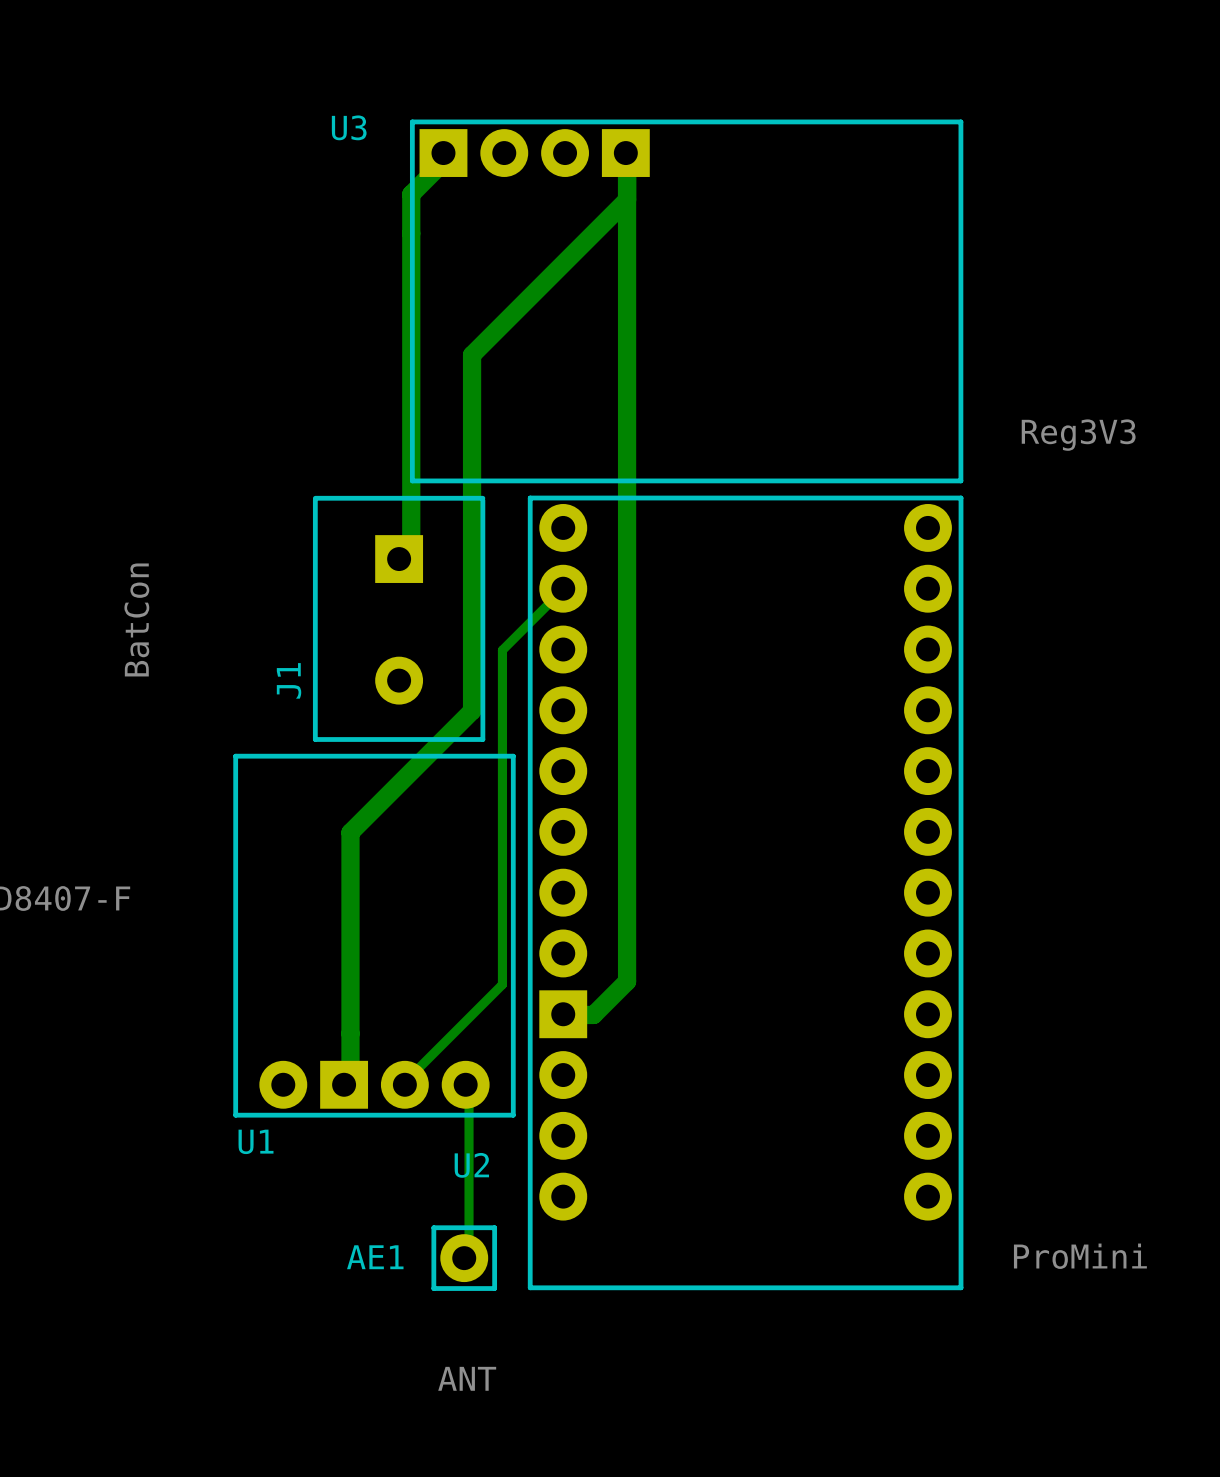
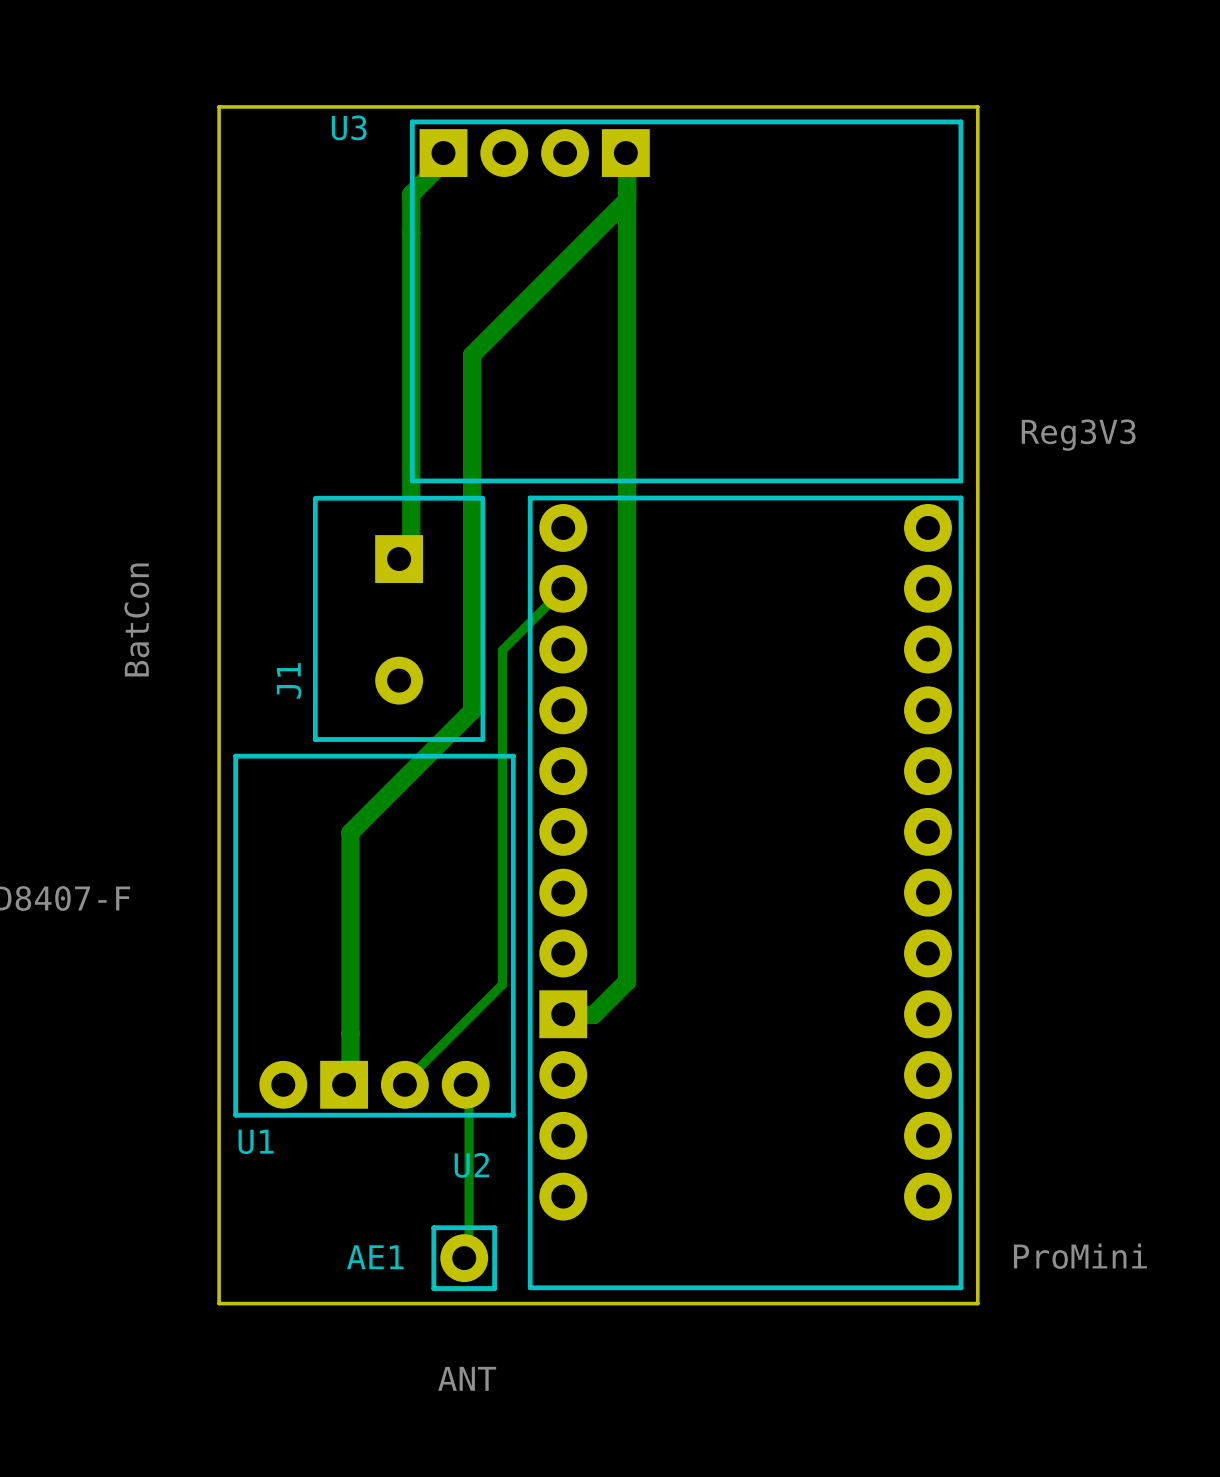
board edge: none -> (219, 106) (219, 1303) (977, 1303) (977, 106) (219, 106)

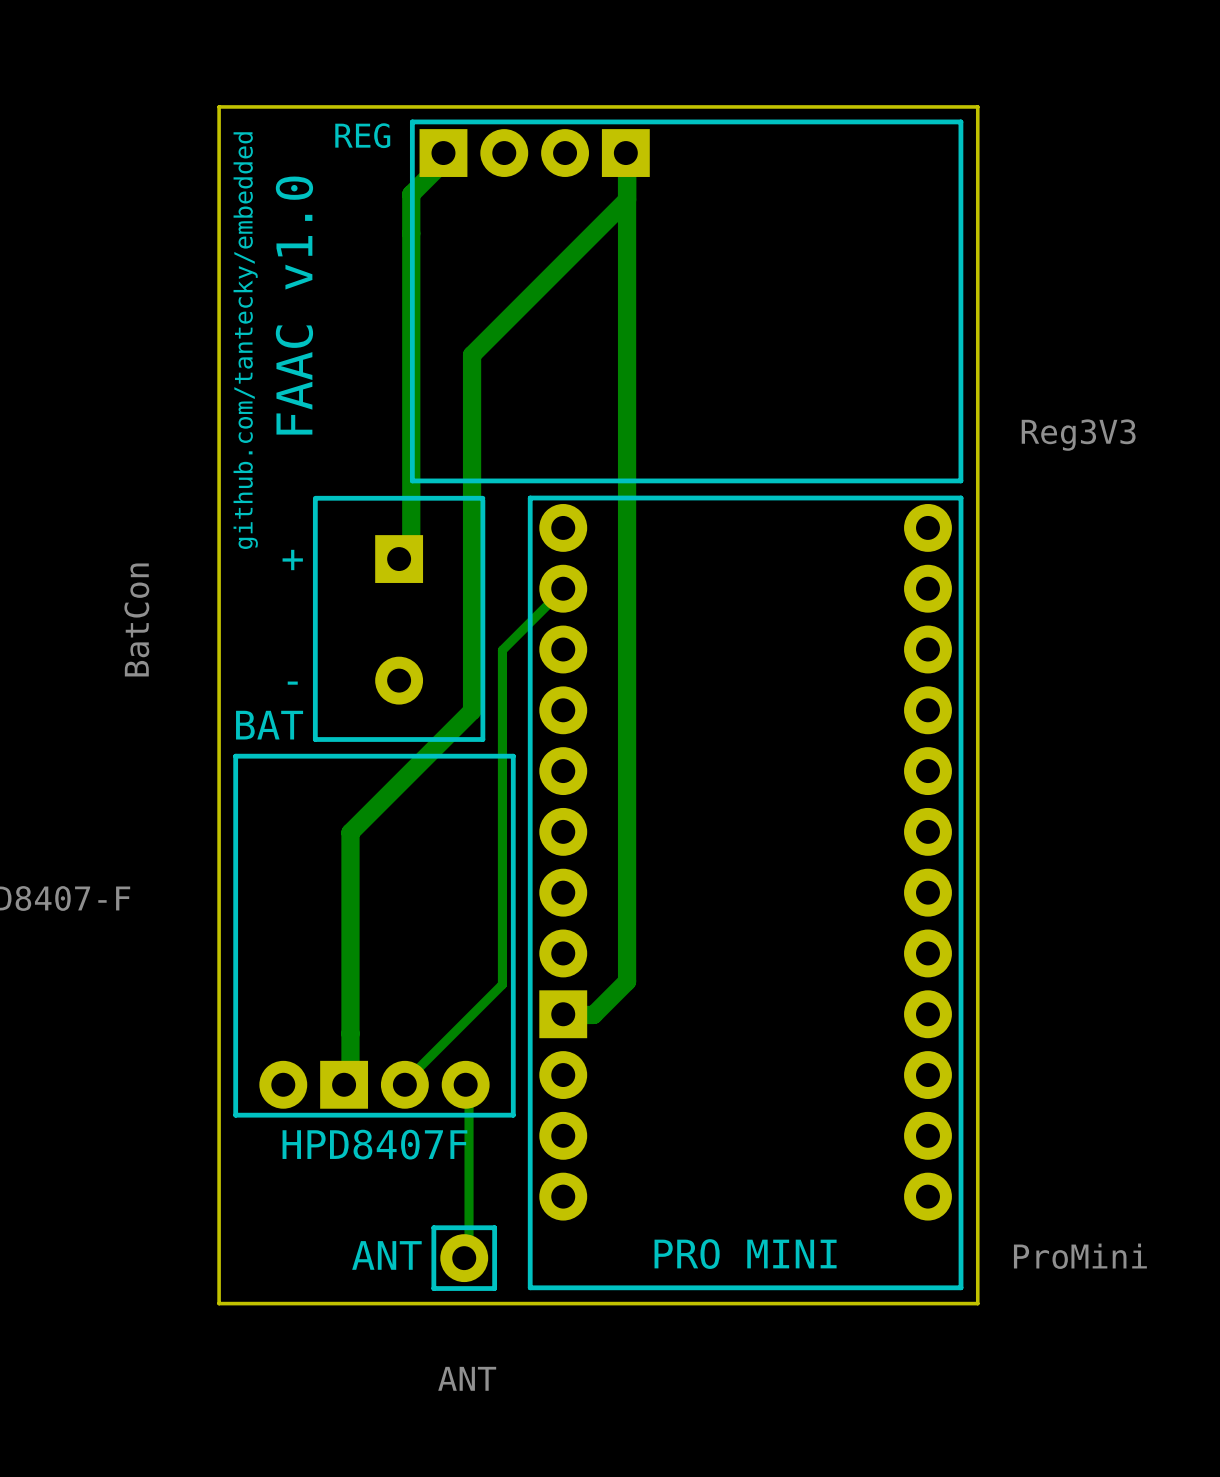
U3 name: U3 (349, 127) -> REG (362, 135)
text: none -> FAAC v1.0 (294, 305)
text: none -> github.com/tantecky/embedded (245, 340)
text: none -> + (292, 559)
J1 name: J1 (289, 680) -> BAT (269, 725)
text: none -> - (292, 683)
U1 name: U1 (256, 1141) -> HPD8407F (374, 1144)
U2 name: U2 (471, 1165) -> PRO MINI (745, 1254)
AE1 name: AE1 (375, 1257) -> ANT (386, 1255)

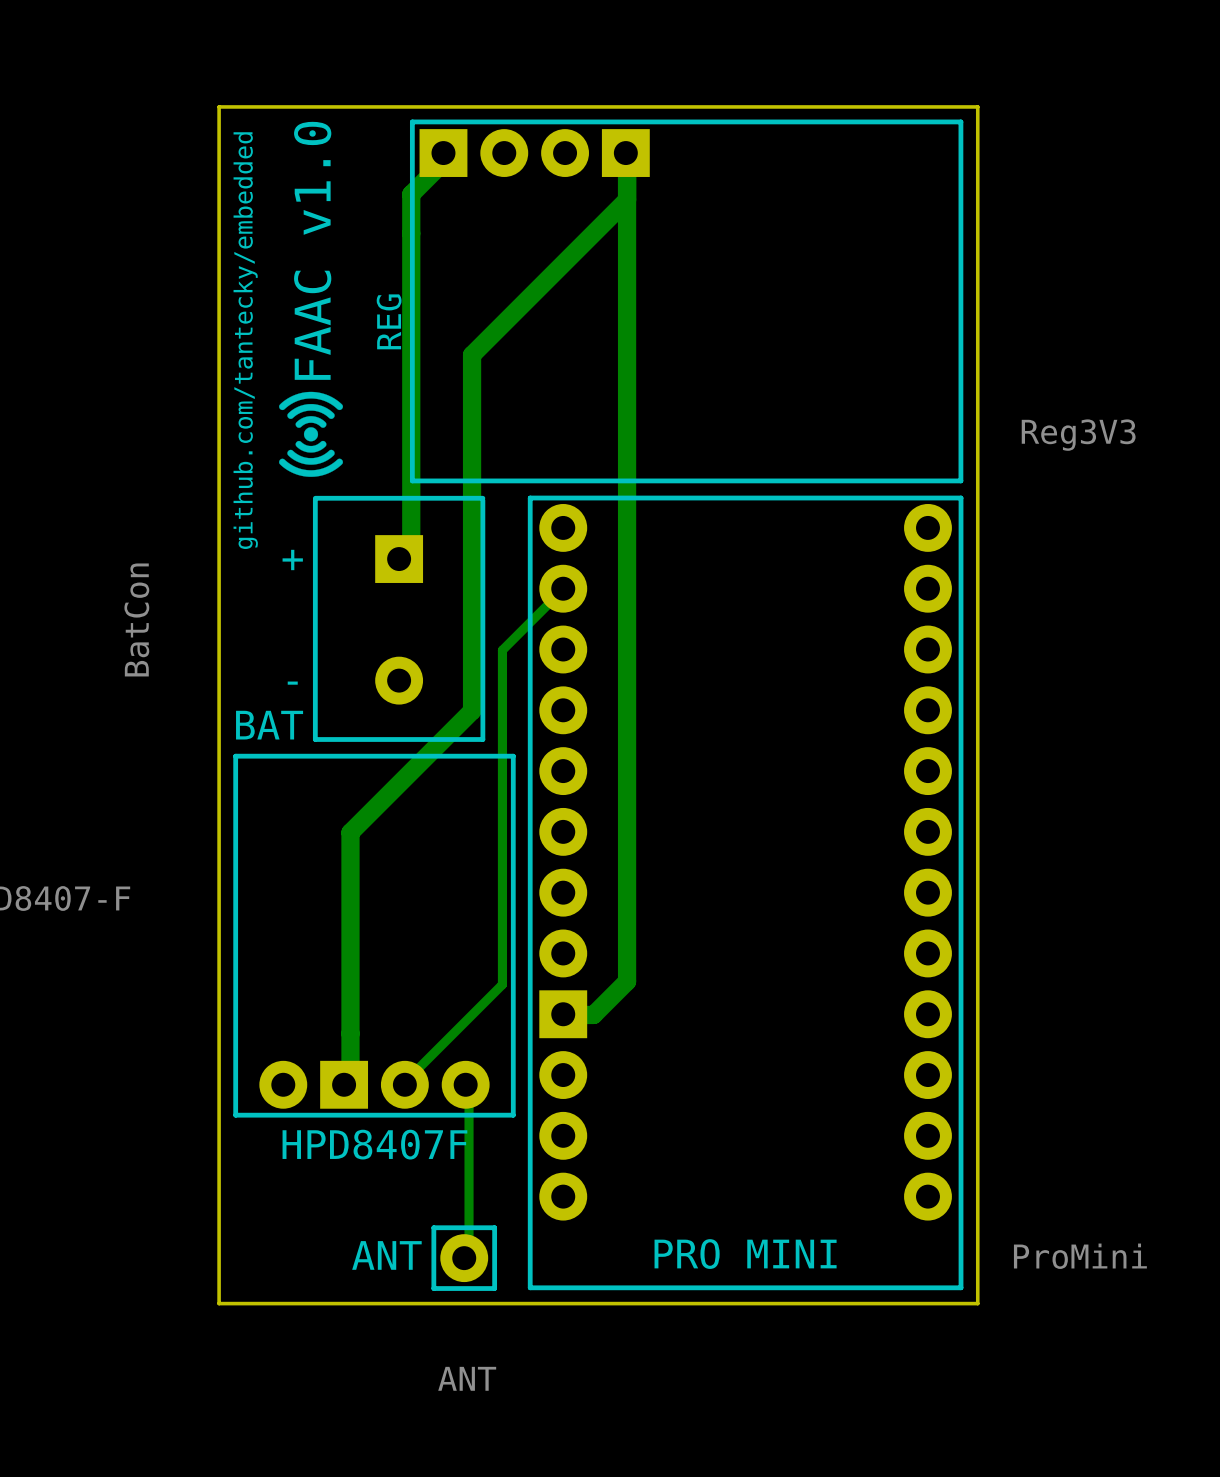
REG name rotation: 0° (362, 135) -> 90° counterclockwise (389, 321)
REG name position: REG (362, 135) -> REG (389, 321)
text position: FAAC v1.0 (294, 305) -> FAAC v1.0 (312, 250)
drawing: none -> [279, 391, 343, 477]

